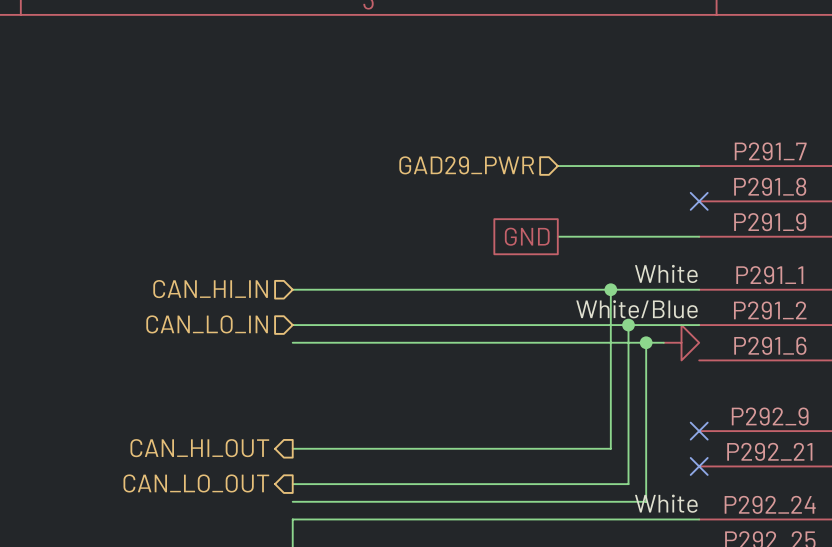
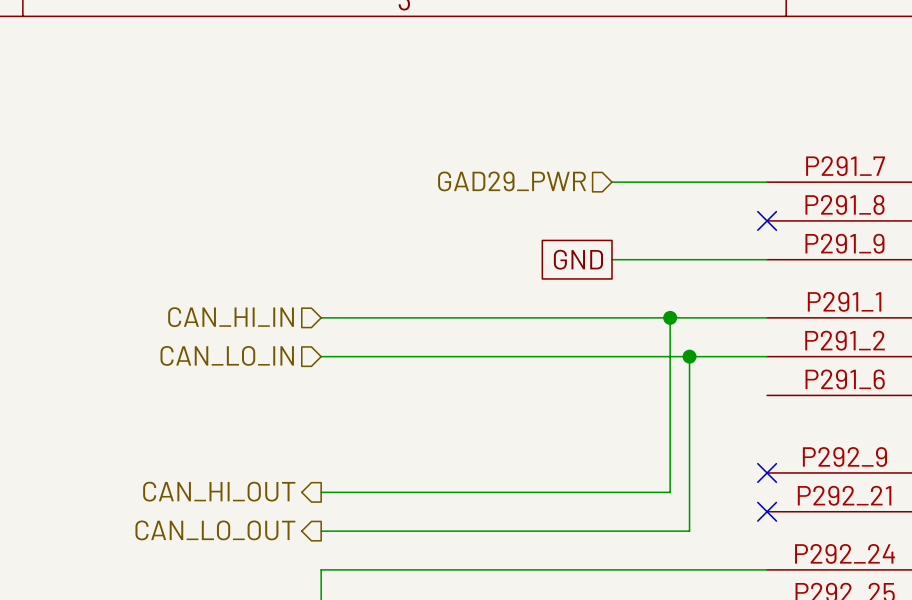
label: White (666, 273) -> none
label: White/Blue (636, 309) -> none
wire: (292, 342) (663, 342) -> none
wire: (646, 342) (646, 501) (292, 501) -> none
junction: (646, 342) -> none
power symbol: (681, 342) -> none
label: White (666, 503) -> none

